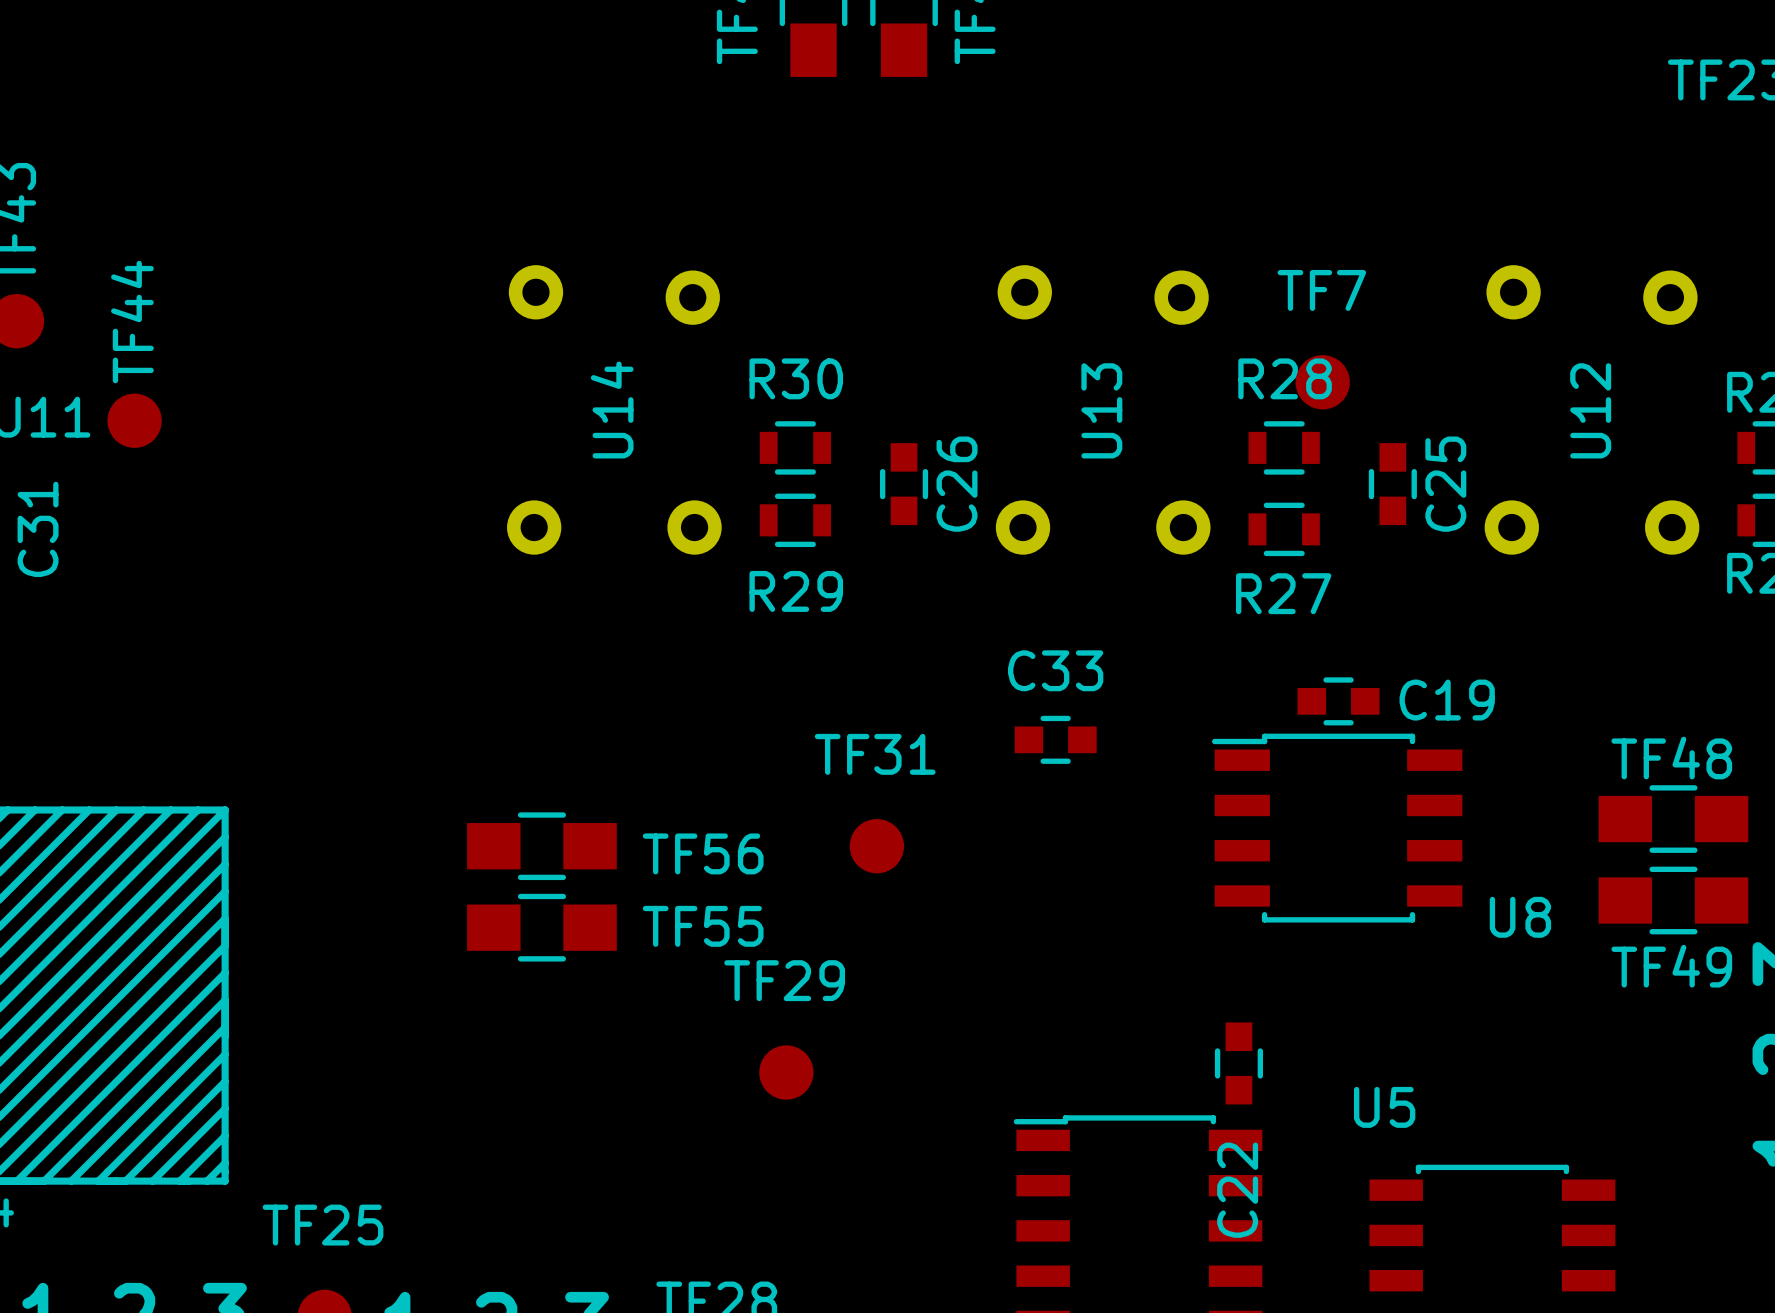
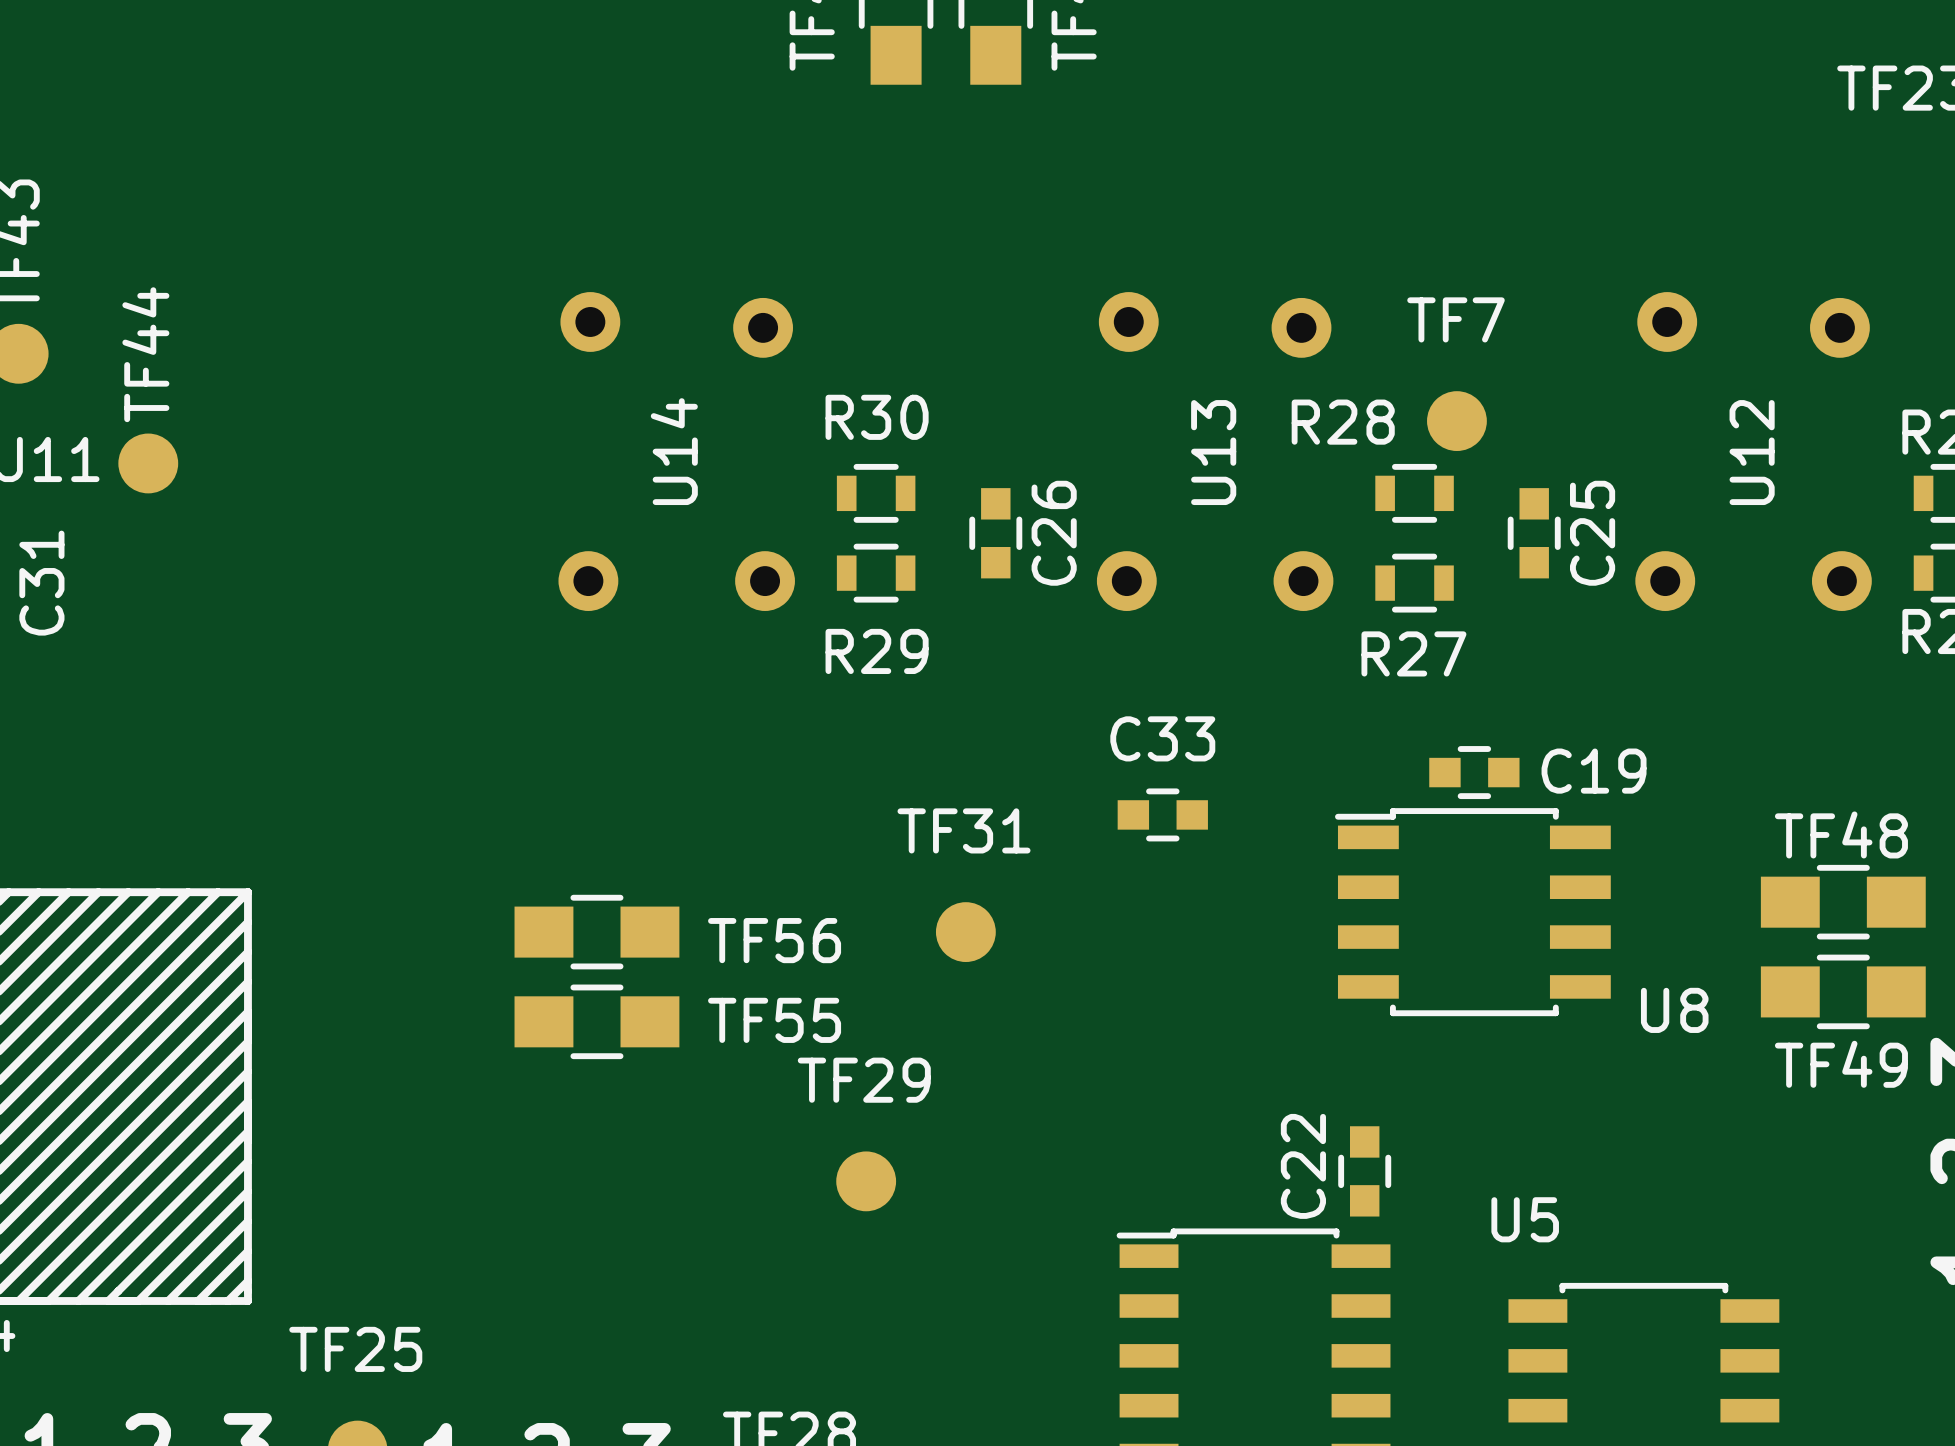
R28 name position: R28 (1285, 378) -> R28 (1343, 422)
C22 name position: C22 (1237, 1190) -> C22 (1303, 1166)

